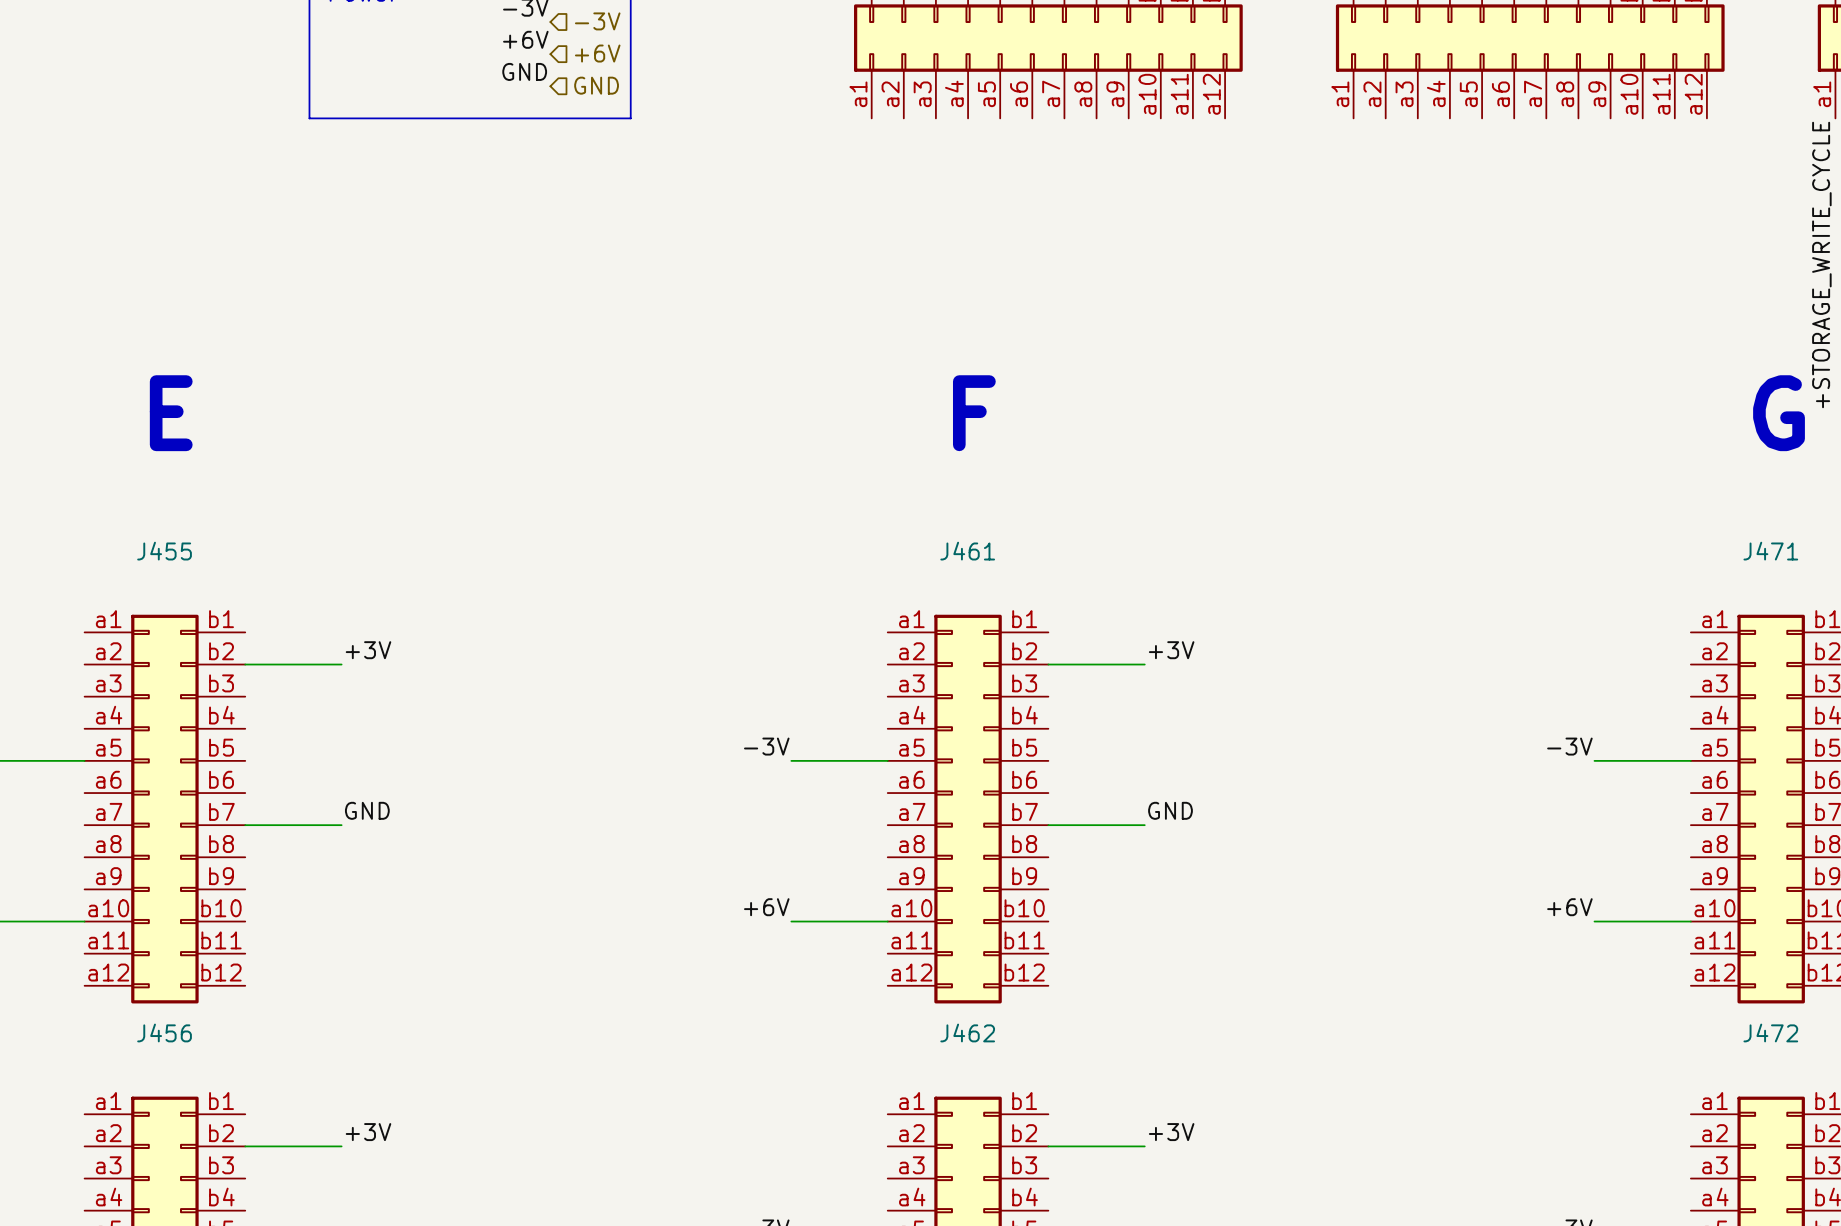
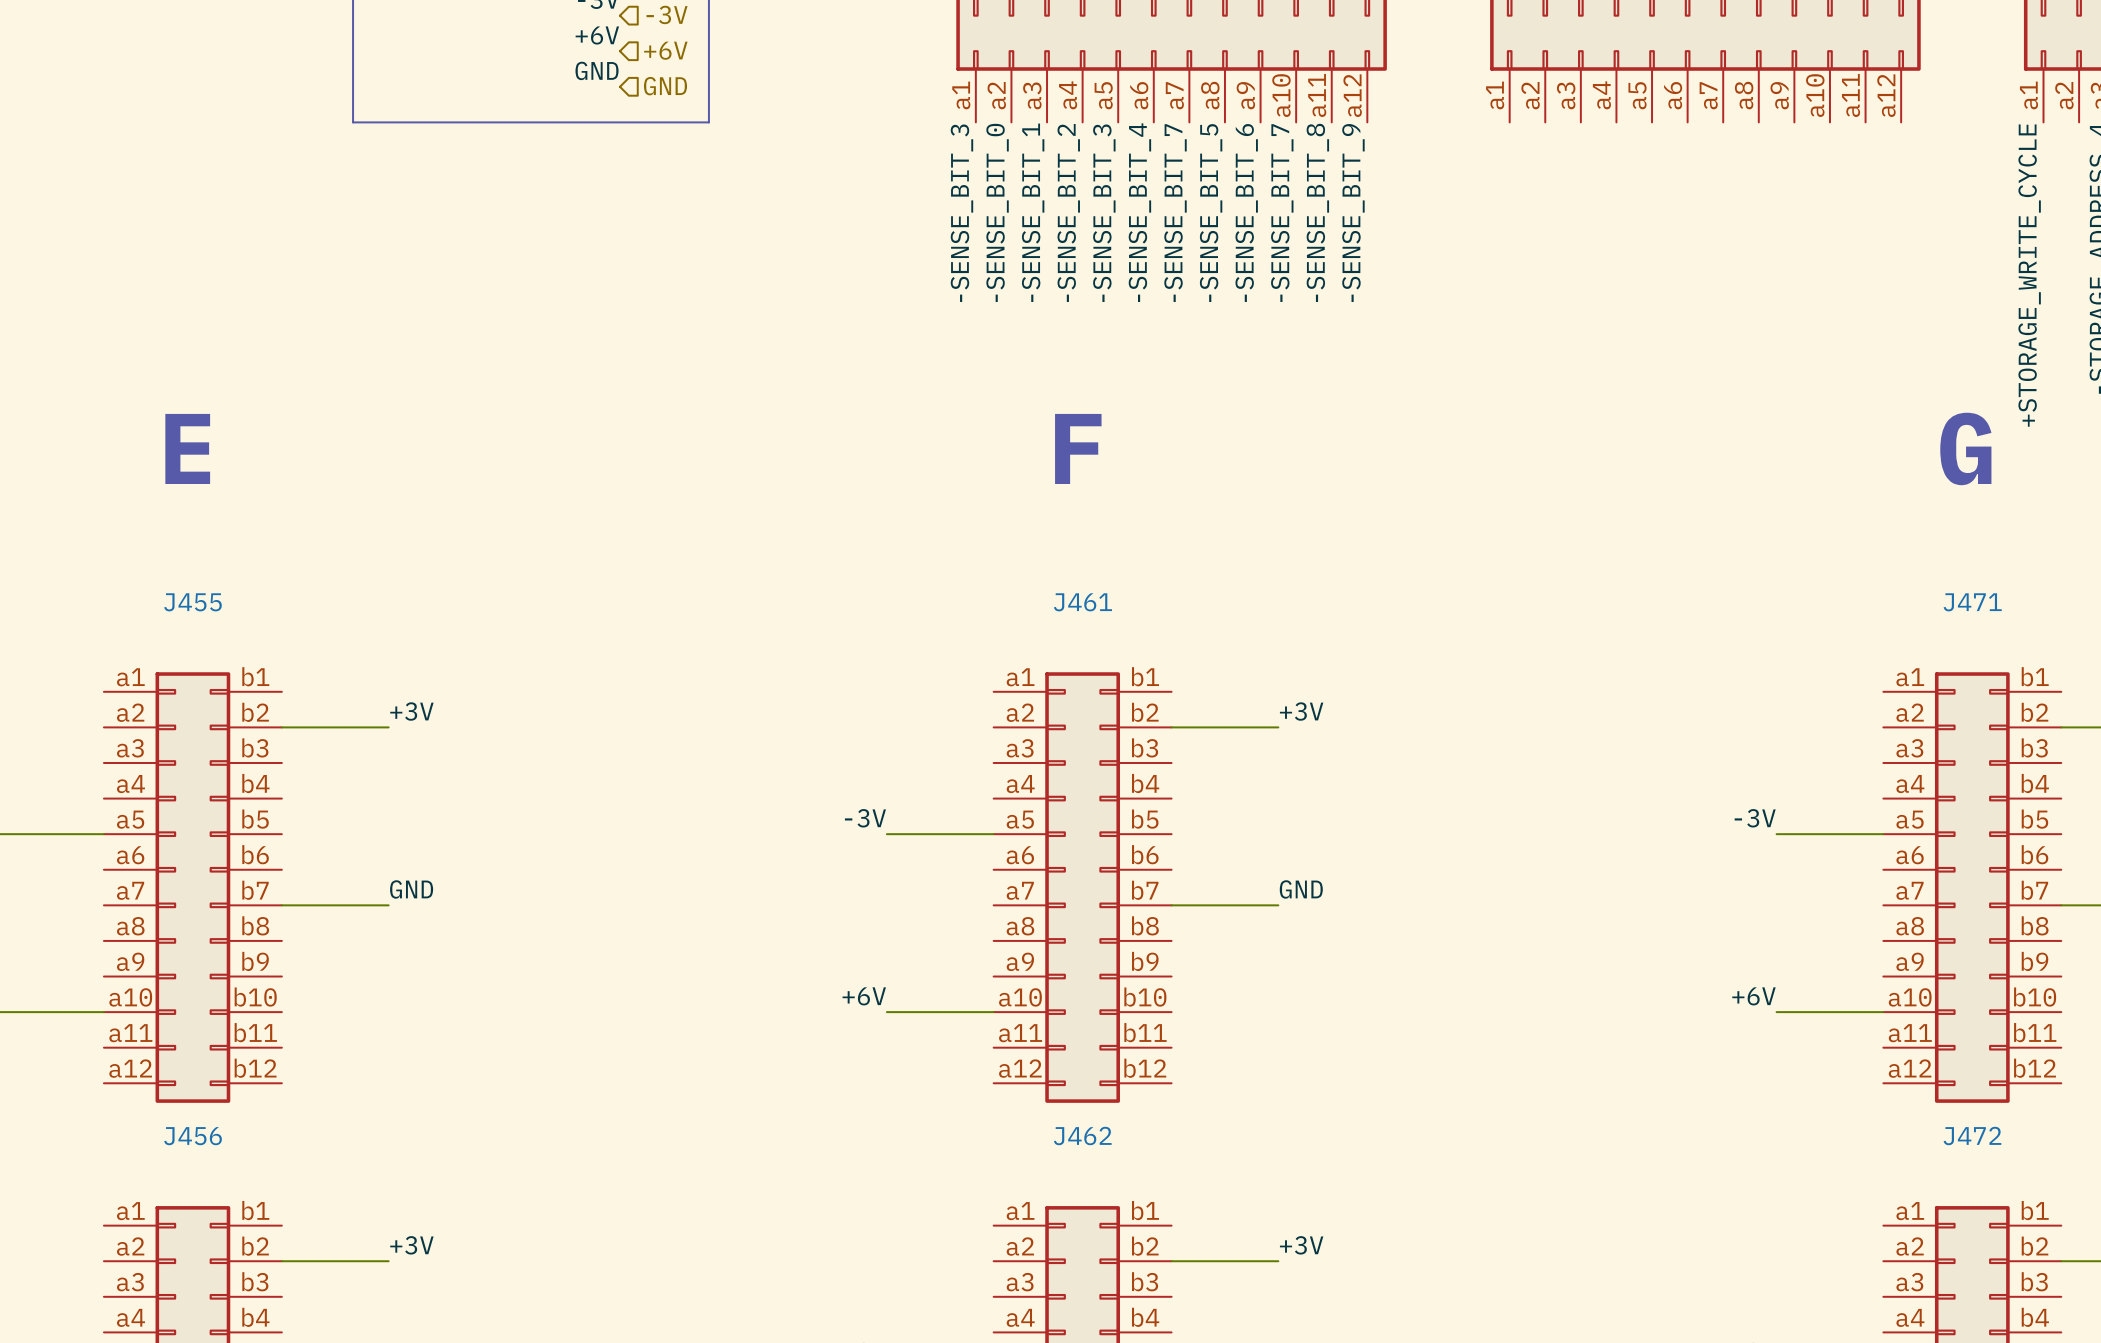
label: none -> -SENSE_BIT_4 (1139, 212)
label: none -> -SENSE_BIT_7 (1175, 213)
label: none -> -SENSE_BIT_7 (1282, 213)
label: none -> -SENSE_BIT_3 (961, 213)
label: none -> -SENSE_BIT_0 (997, 212)
label: none -> -SENSE_BIT_1 (1033, 212)
label: none -> -SENSE_BIT_2 (1068, 213)
label: none -> -SENSE_BIT_3 (1104, 213)
label: none -> -SENSE_BIT_5 (1211, 213)
label: none -> -SENSE_BIT_6 (1246, 213)
label: none -> -SENSE_BIT_8 (1317, 212)
label: none -> -SENSE_BIT_9 (1353, 213)

